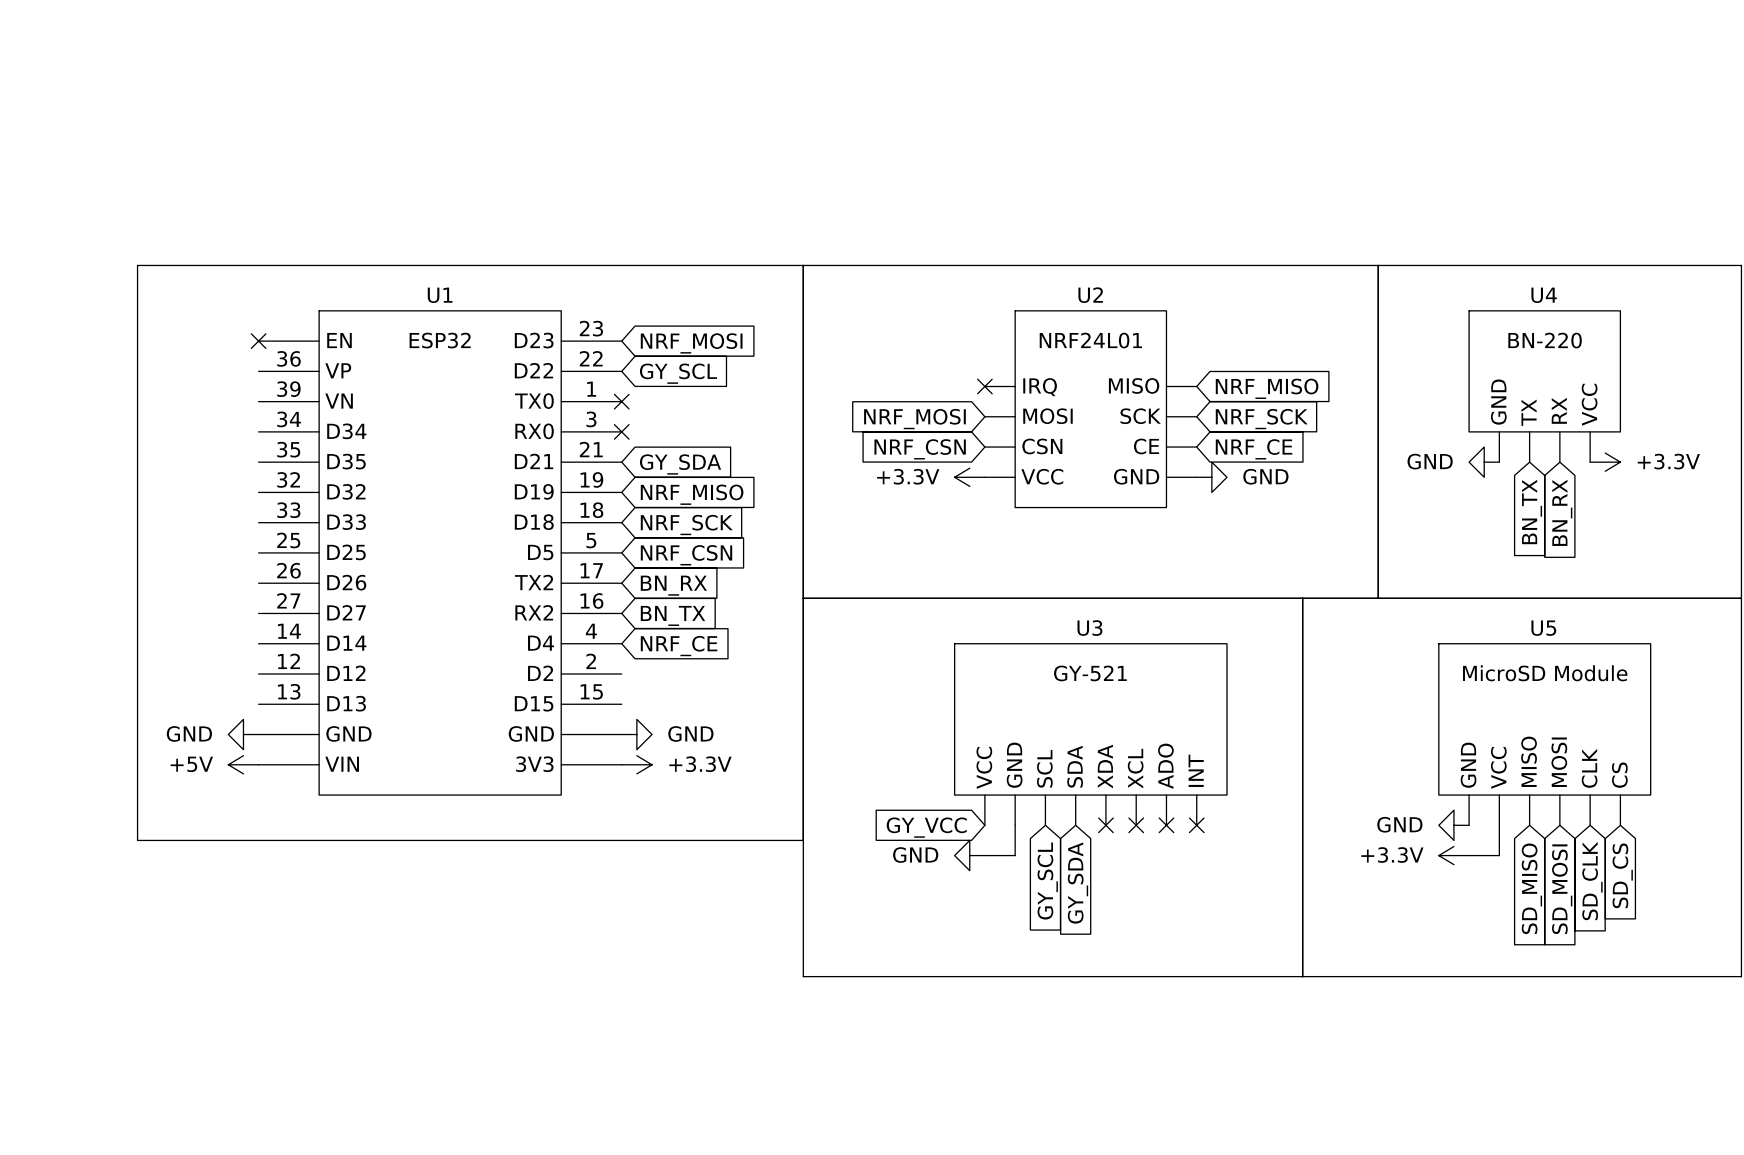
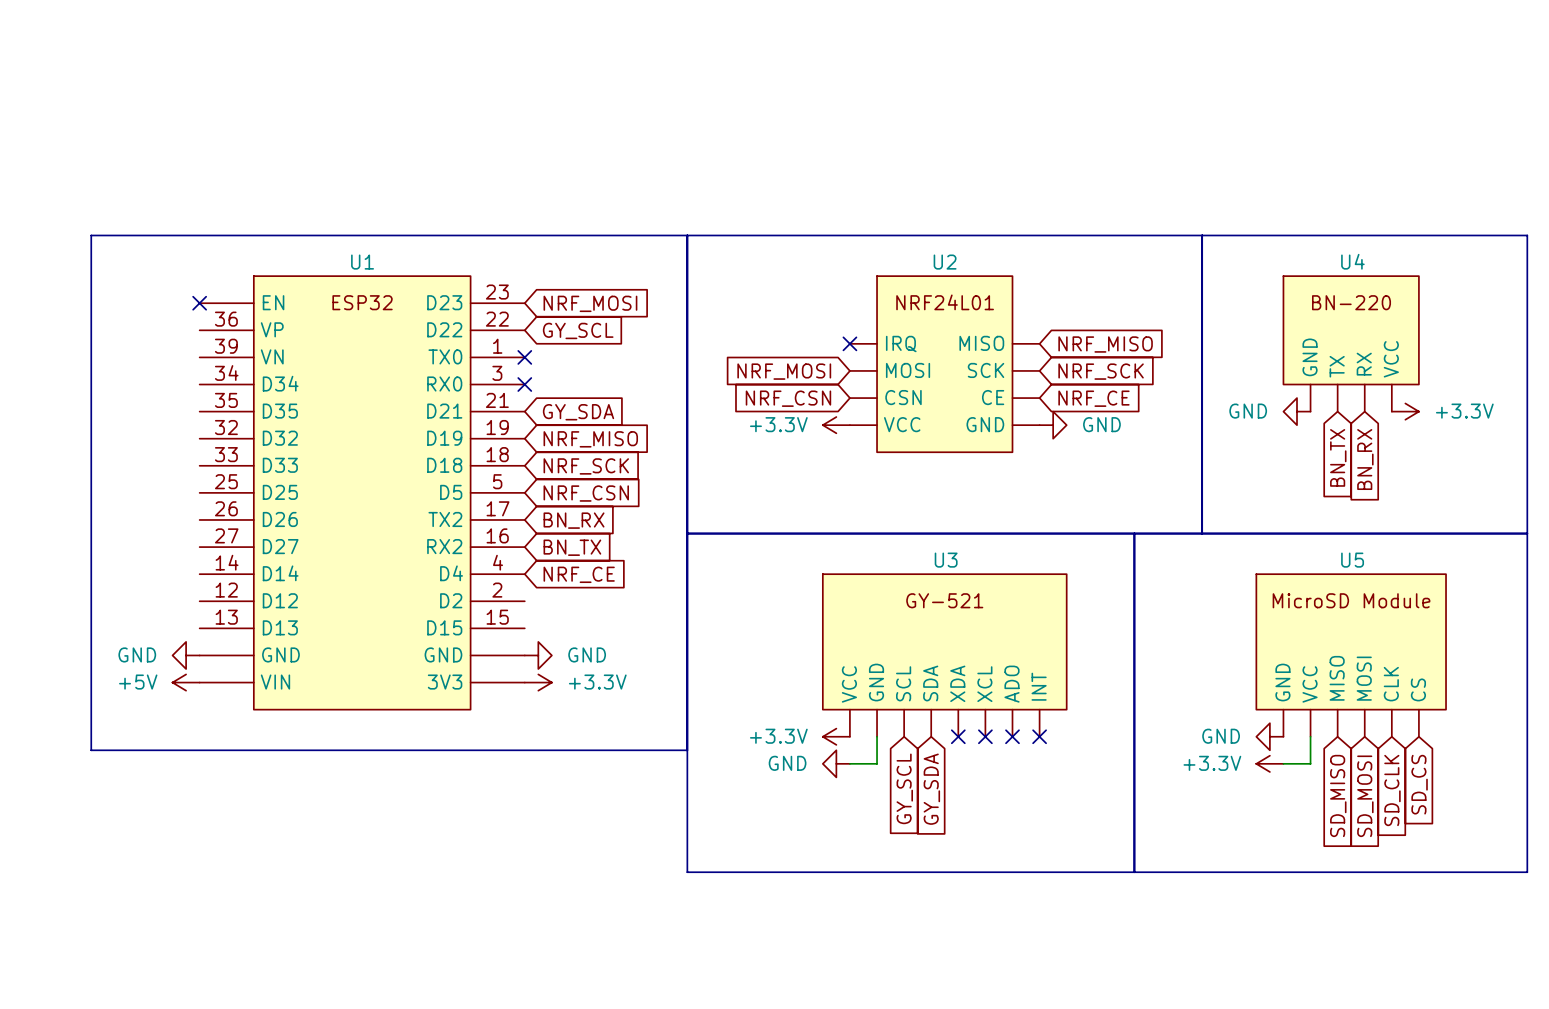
power symbol: none -> +3.3V (836, 736)
global label: GY_VCC (926, 827) -> none

